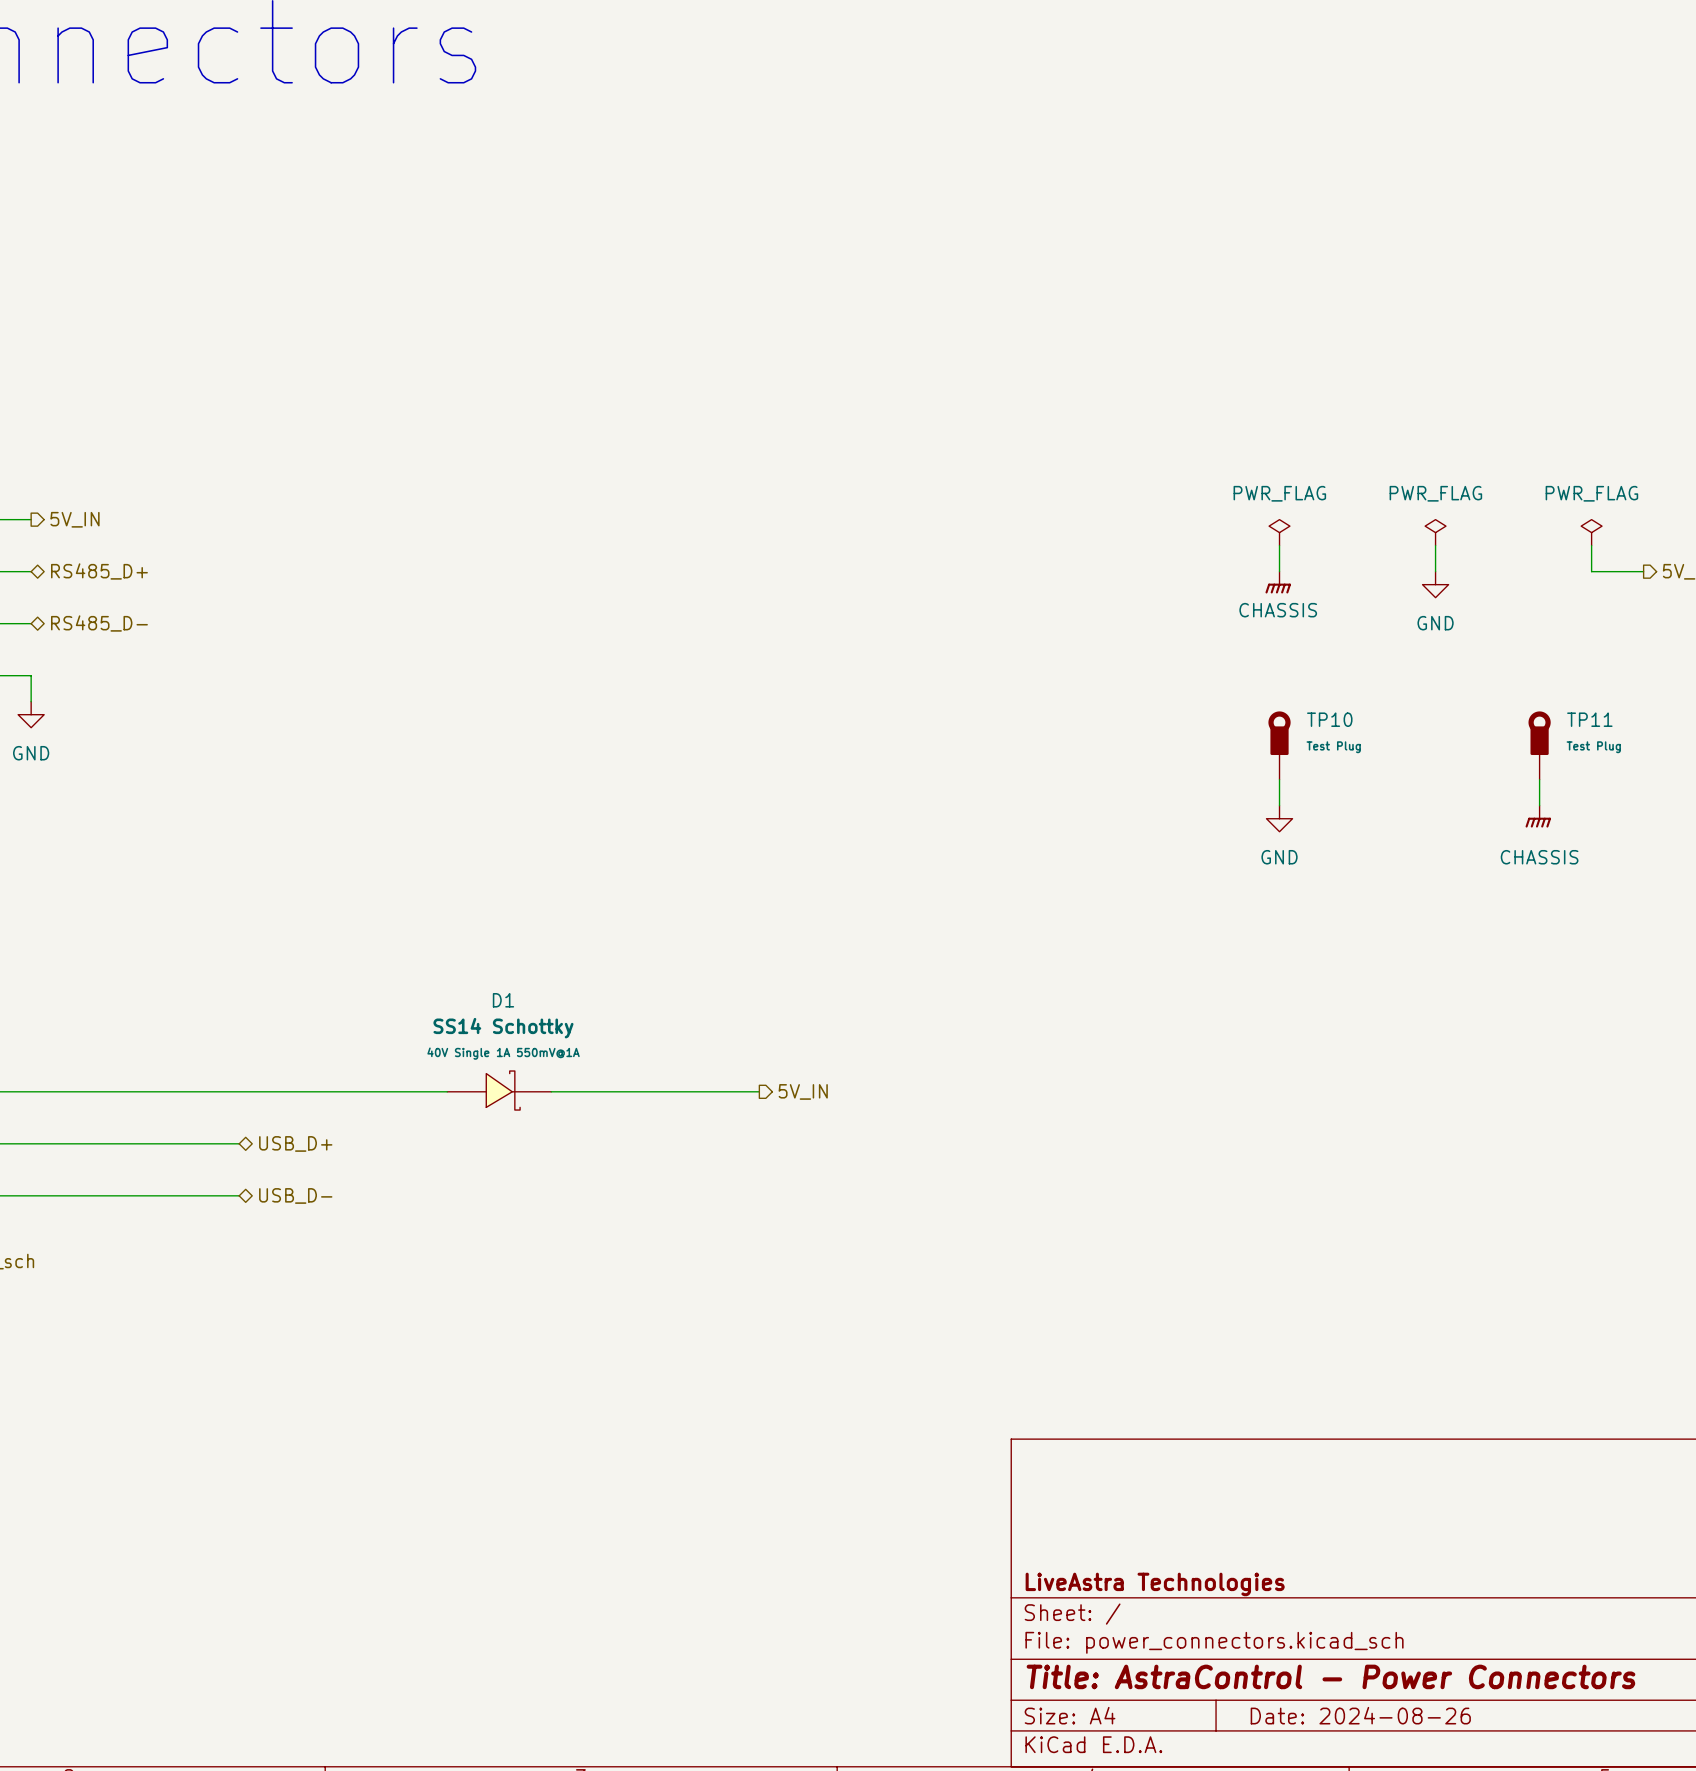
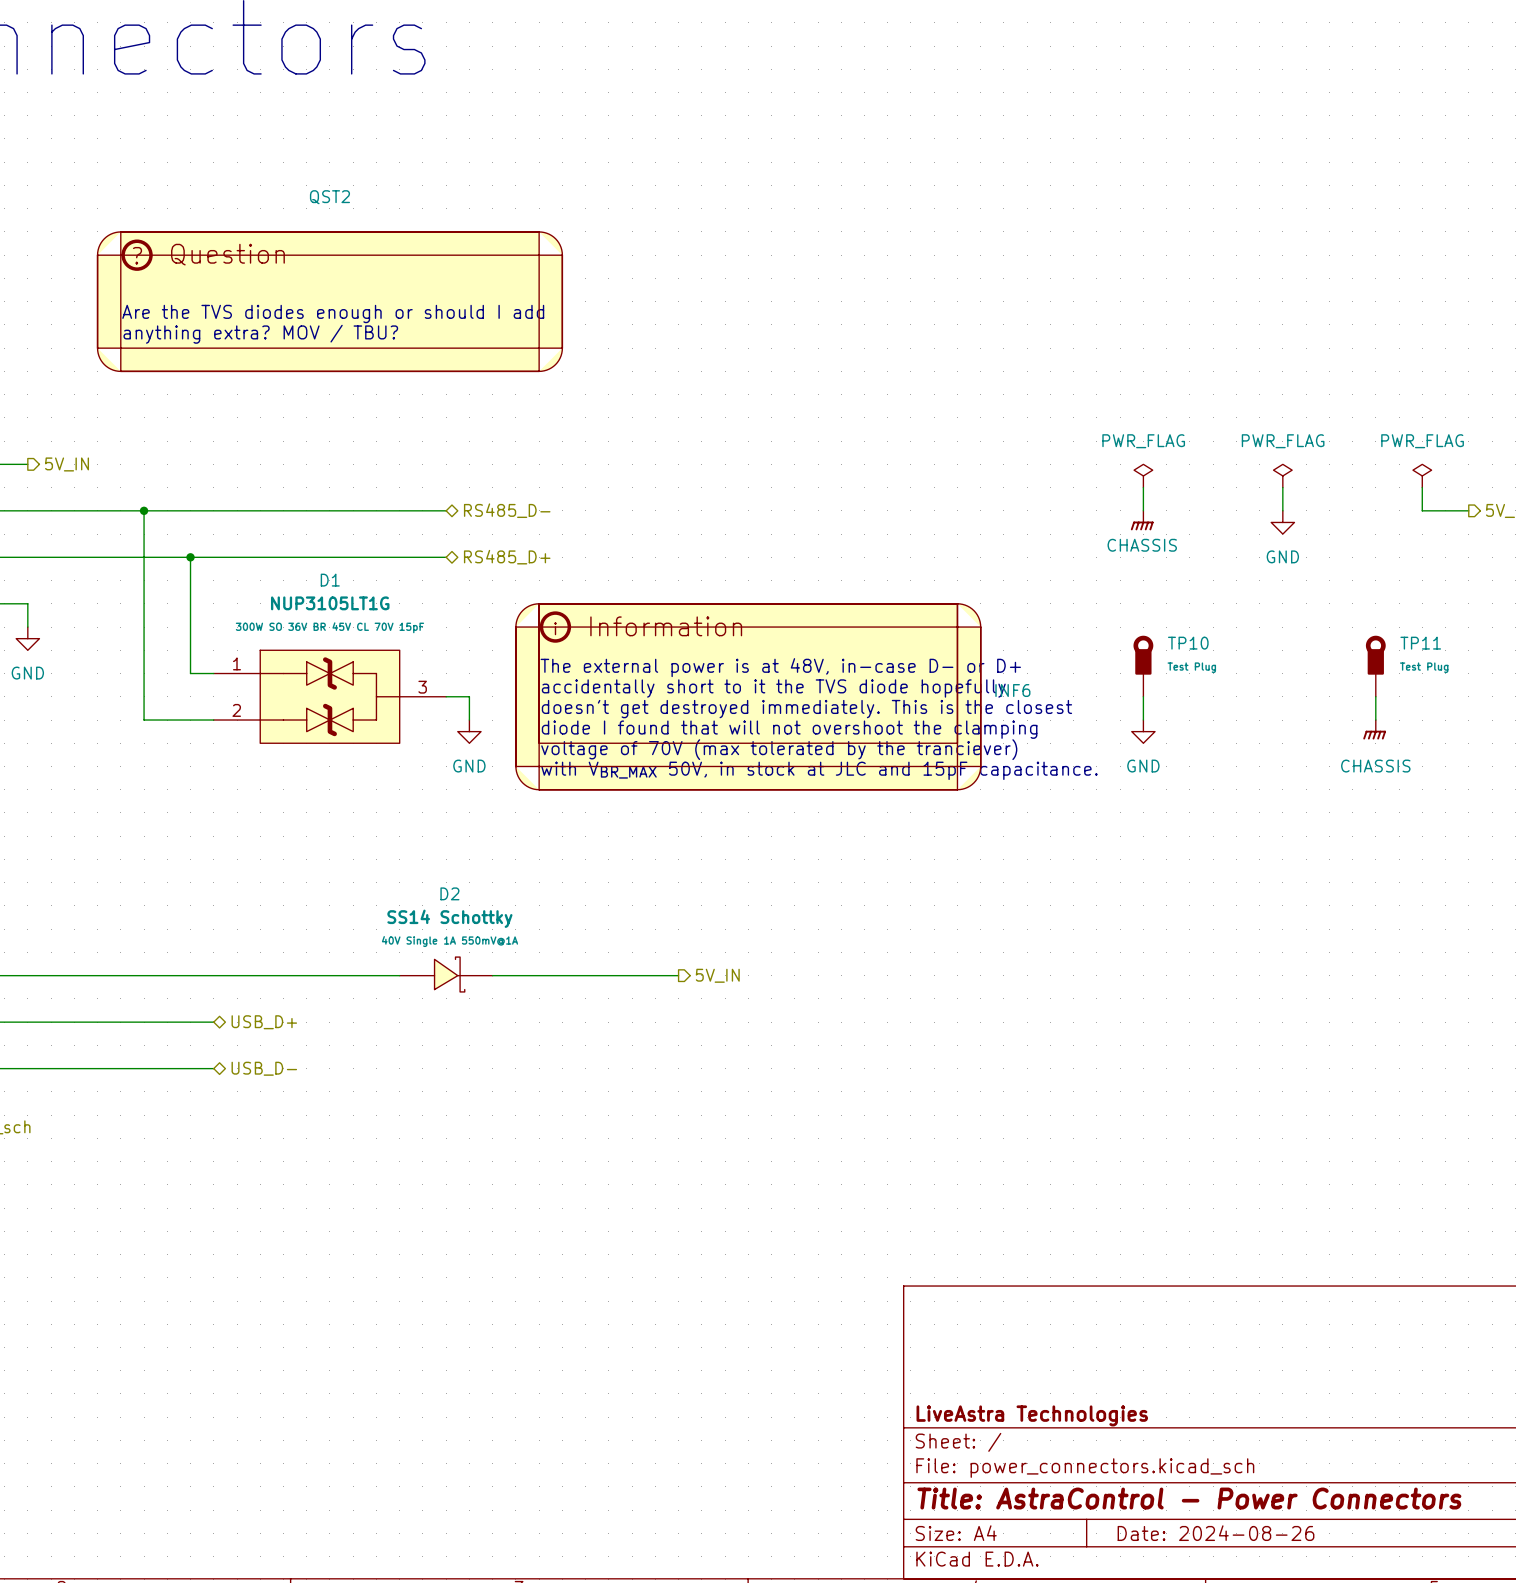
QST2: none -> (329, 301)
text: none -> Are the TVS diodes enough or should I add (333, 313)
text: none -> anything extra? MOV / TBU? (260, 334)
wire: none -> (27, 510) (446, 510)
hierarchical label: RS485_D+ (99, 571) -> none
wire: none -> (144, 510) (144, 720) (213, 720)
junction: none -> (144, 510)
hierarchical label: none -> RS485_D- (507, 510)
wire: none -> (27, 557) (446, 557)
hierarchical label: RS485_D- (99, 623) -> none
wire: none -> (190, 557) (190, 673) (213, 673)
junction: none -> (190, 557)
hierarchical label: none -> RS485_D+ (507, 557)
text: none -> The external power is at 48V, in-case D- or D+ (780, 667)
text: none -> accidentally short to it the TVS diode hopefully (773, 688)
D1: none -> NUP3105LT1G (329, 696)
wire: none -> (446, 696) (469, 696) (469, 720)
INF6: none -> (748, 696)
text: none -> doesn't get destroyed immediately. This is the closest (806, 709)
text: none -> diode I found that will not overshoot the clamping (789, 729)
power symbol: none -> GND (469, 731)
text: none -> voltage of 70V (max tolerated by the tranciever) (779, 749)
text: none -> with VBR_MAX 50V, in stock at JLC and 15pF capacitance. (819, 770)
D1 name: D1 (503, 1000) -> D2 (449, 893)

